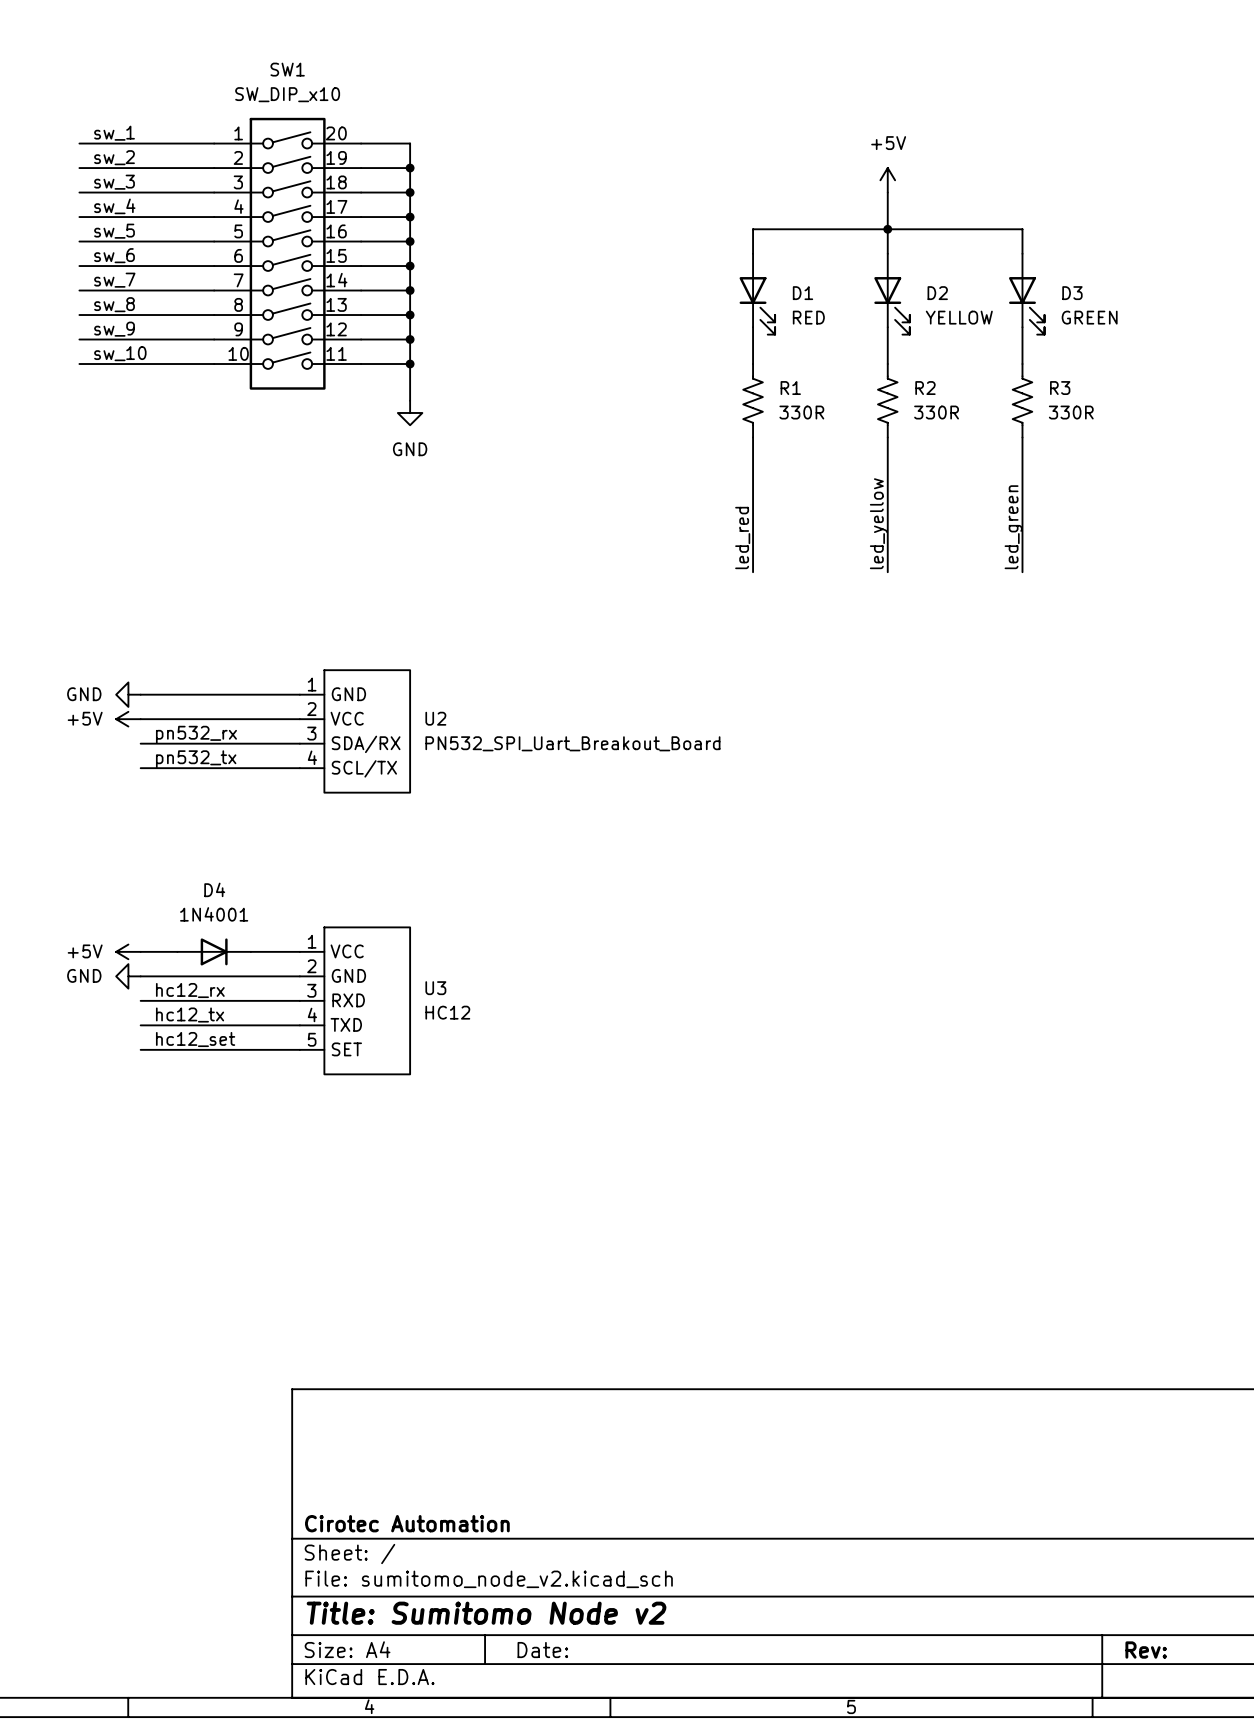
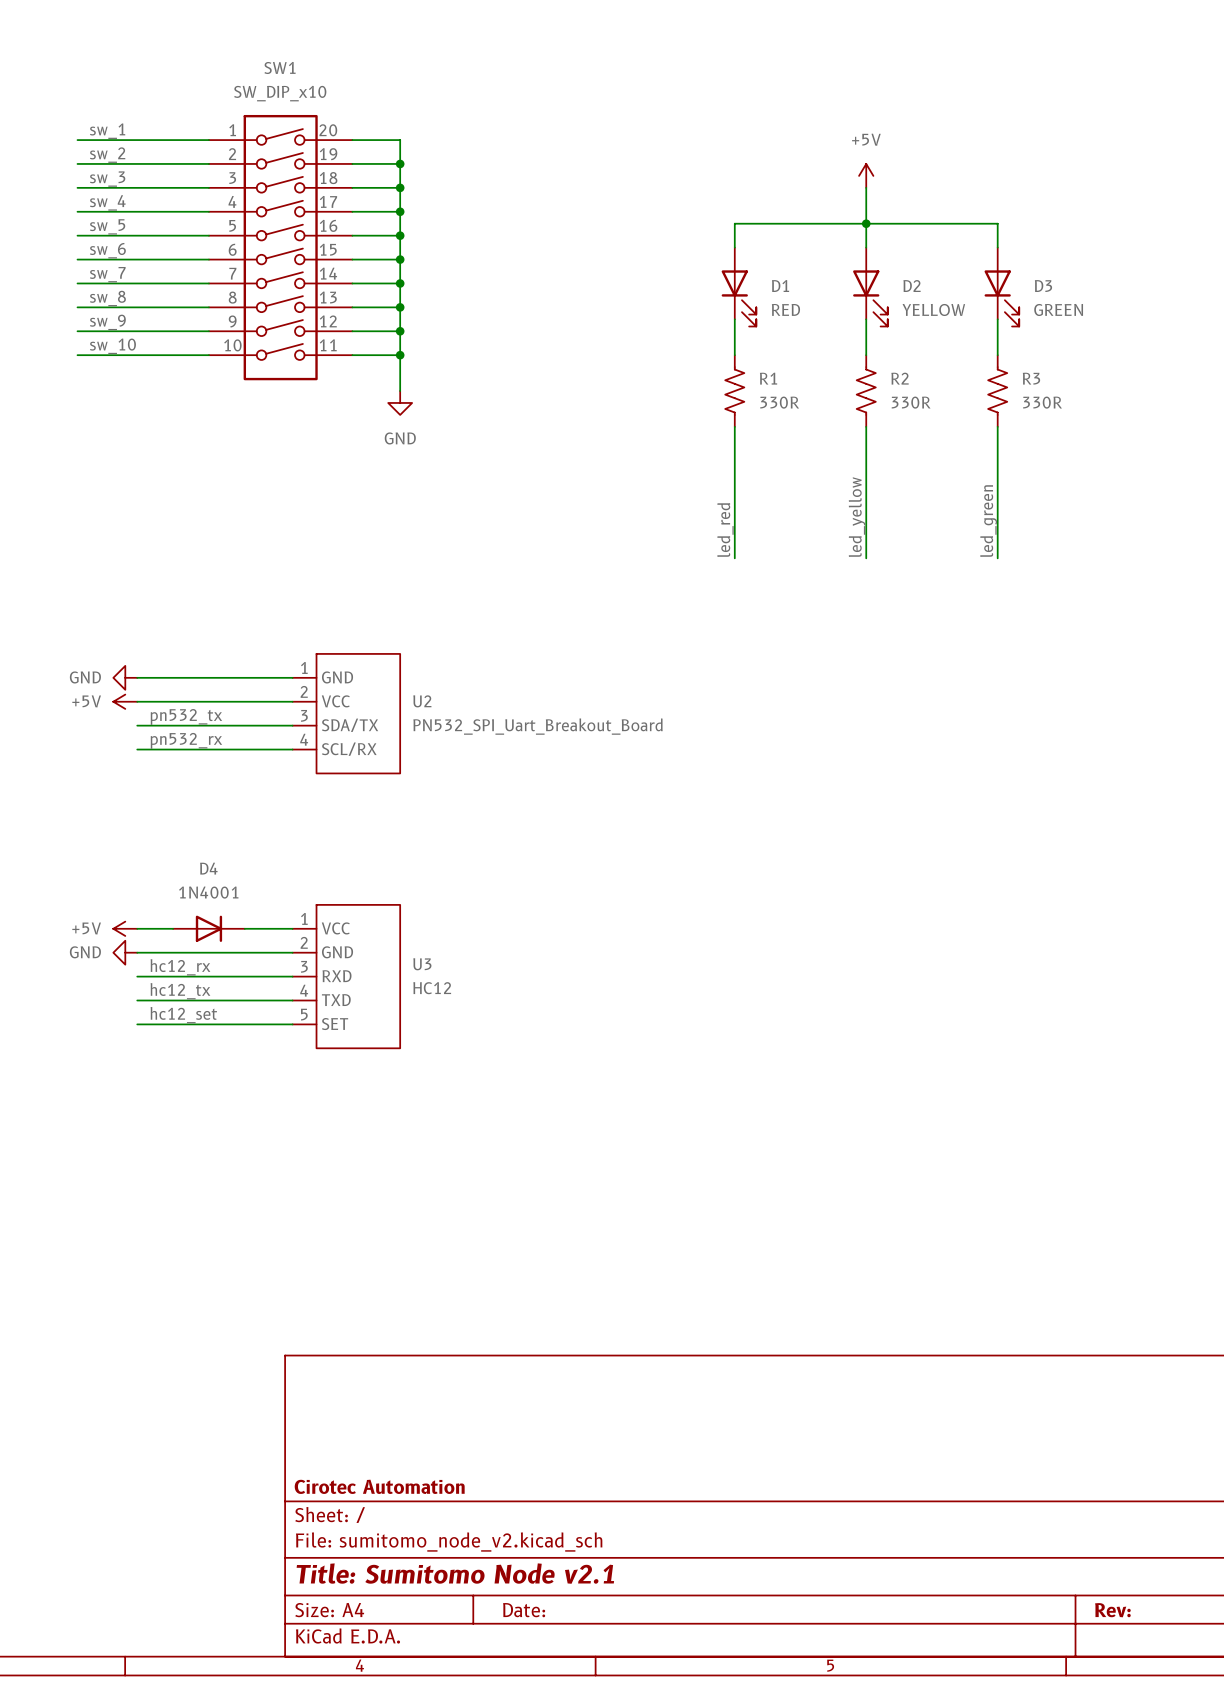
label: pn532_rx (196, 734) -> pn532_tx (186, 716)
U2 pin name: SDA/RX (366, 744) -> SDA/TX (350, 725)
label: pn532_tx (196, 759) -> pn532_rx (186, 740)
U2 pin name: SCL/TX (364, 768) -> SCL/RX (349, 749)
title block: Title: Sumitomo Node v2 (486, 1613) -> Title: Sumitomo Node v2.1 (455, 1573)

